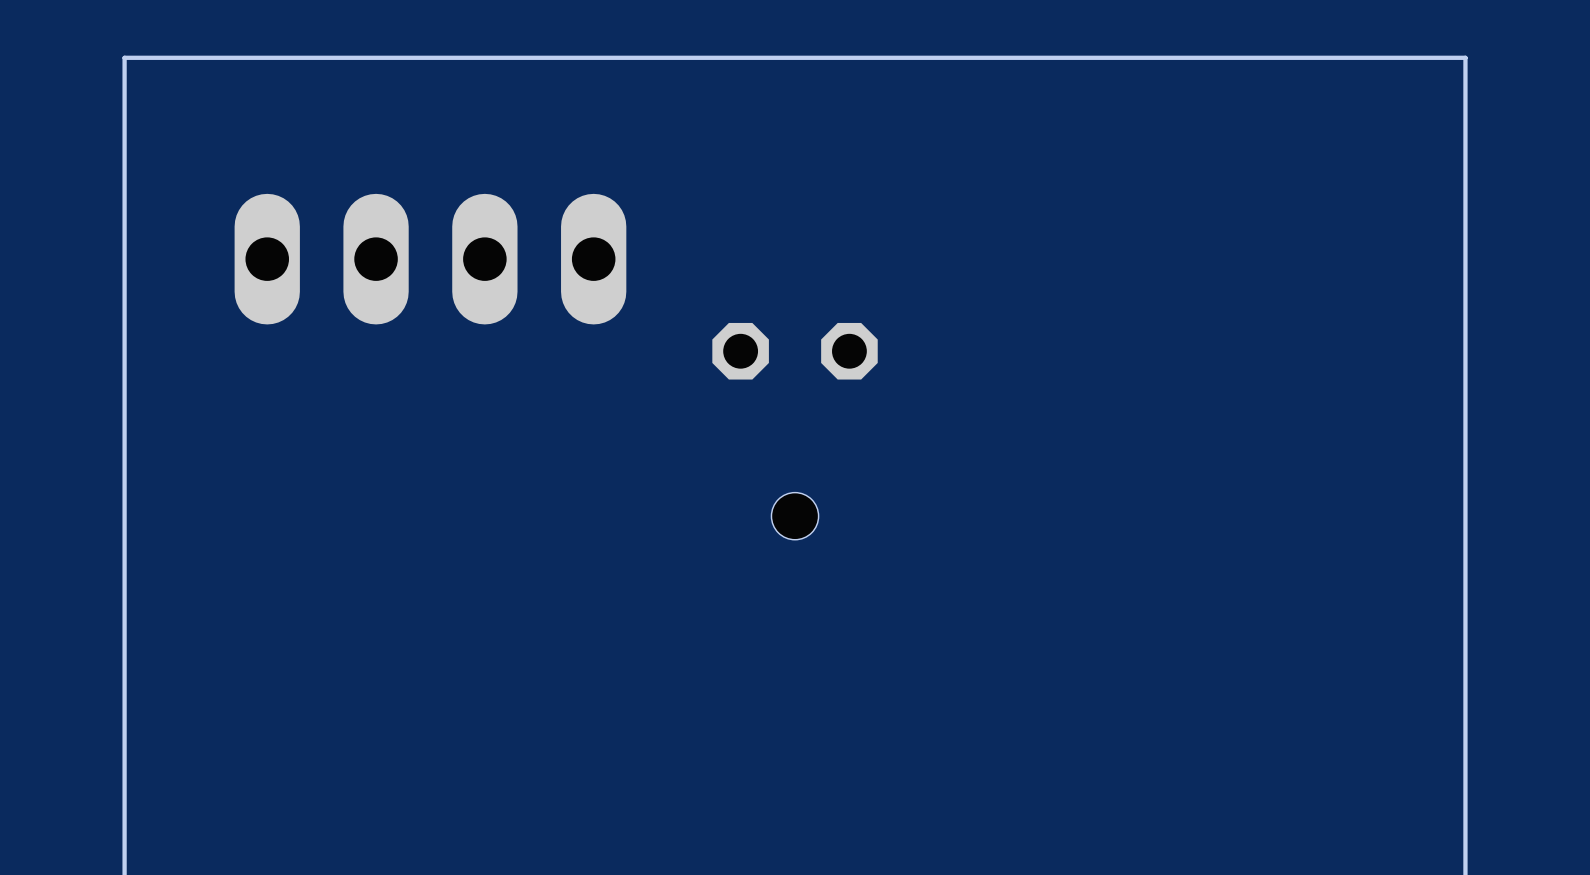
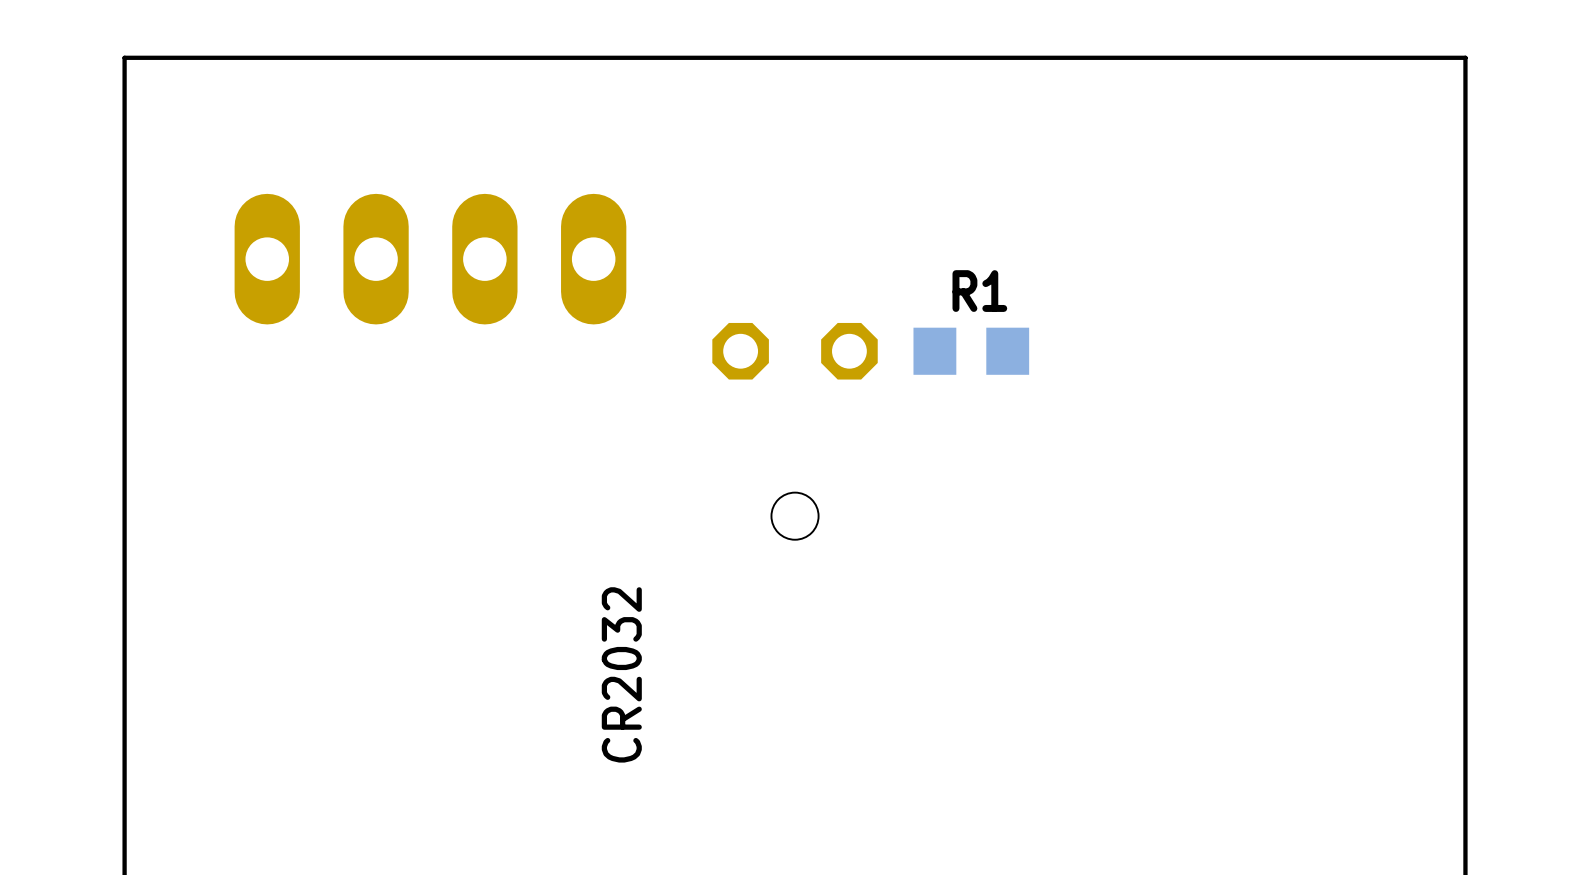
R1: none -> (971, 351)
text: none -> CR2032 (621, 674)

